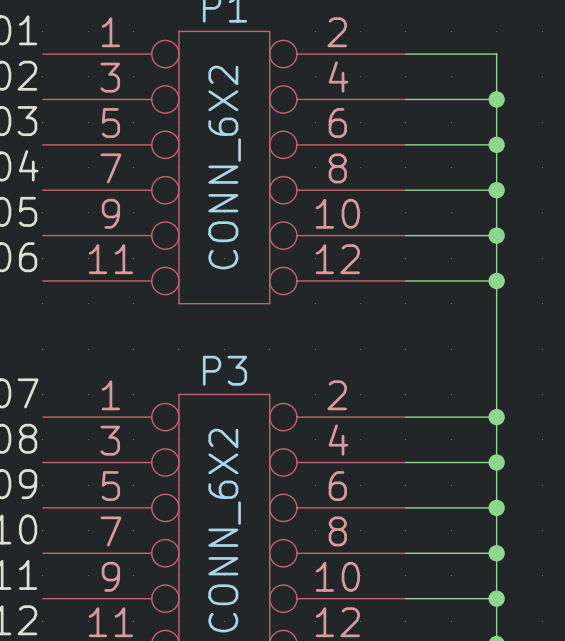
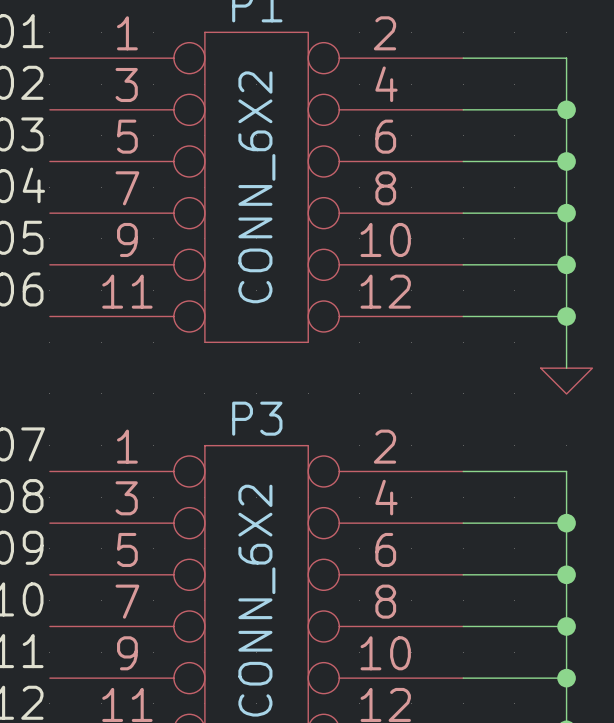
wire: (496, 326) (496, 417) -> none
power symbol: none -> (566, 381)
junction: (496, 417) -> none

